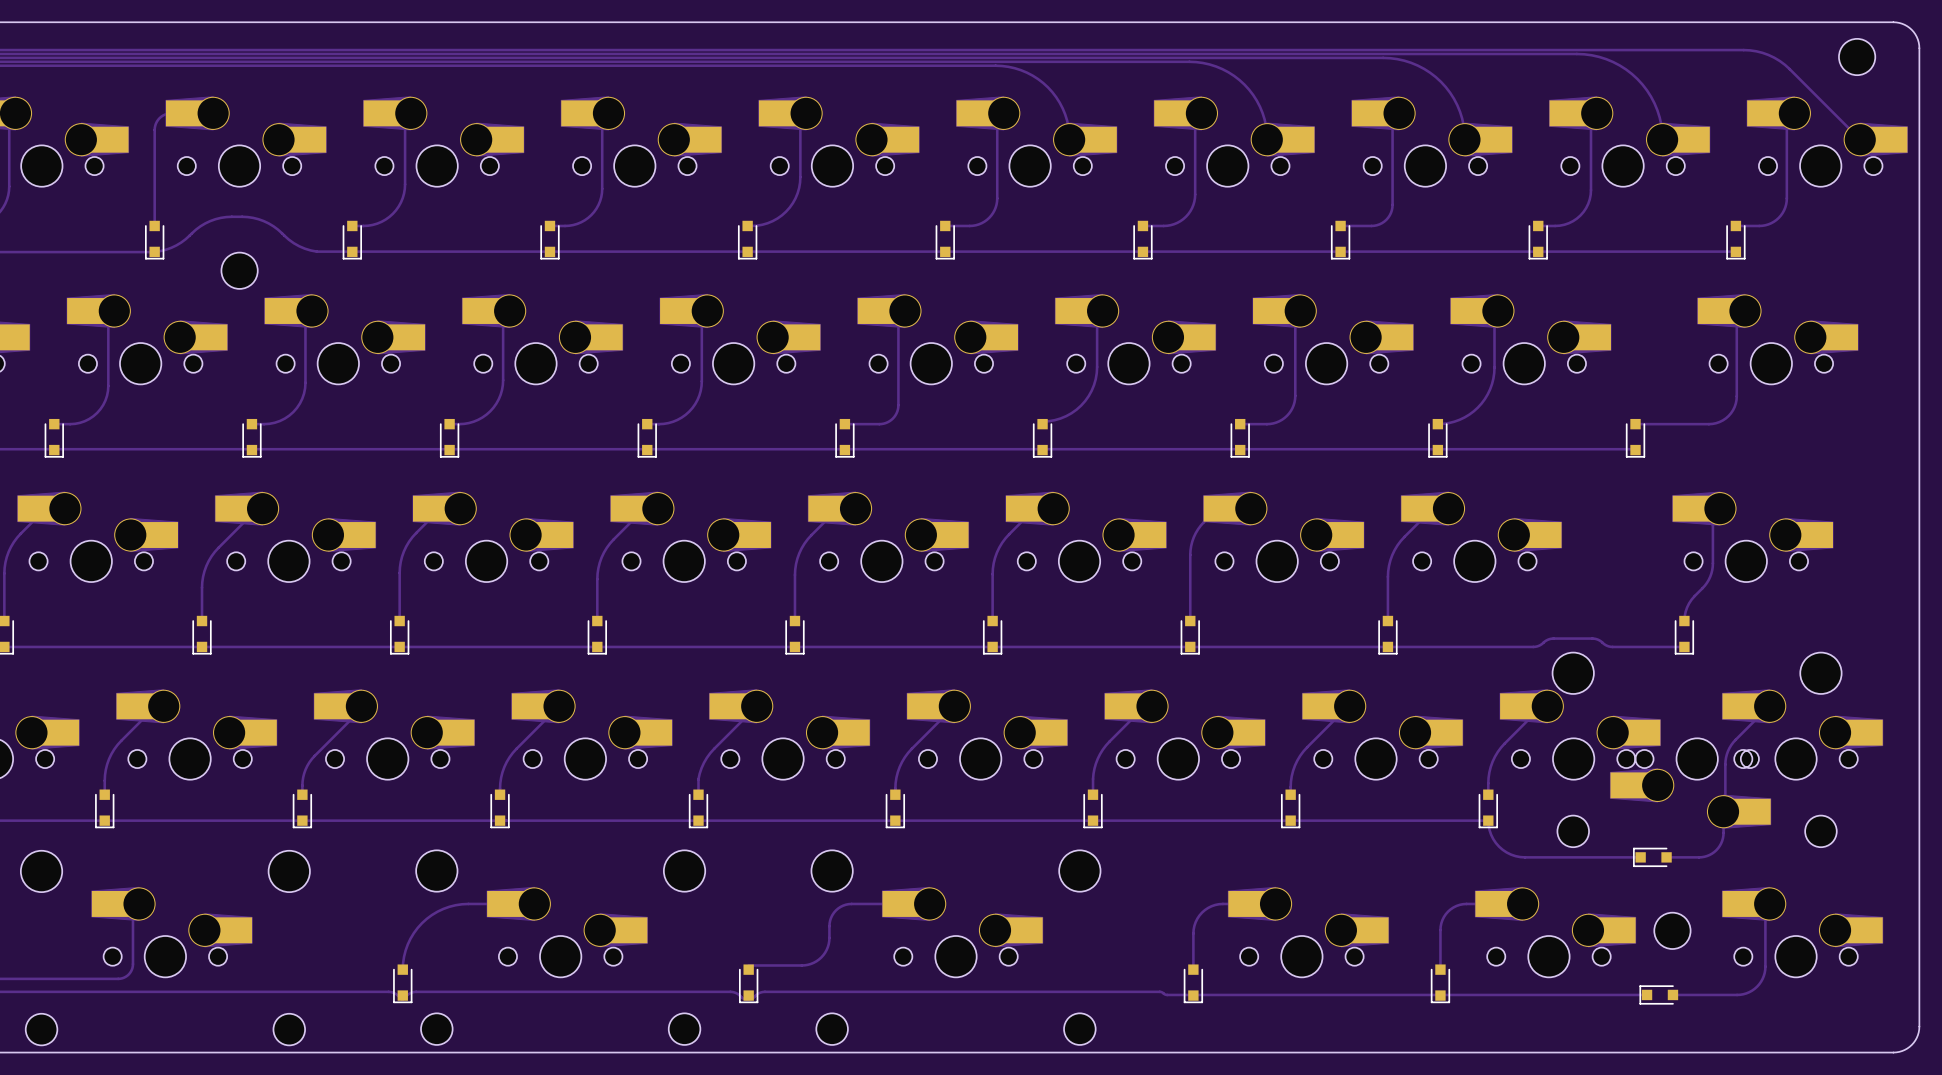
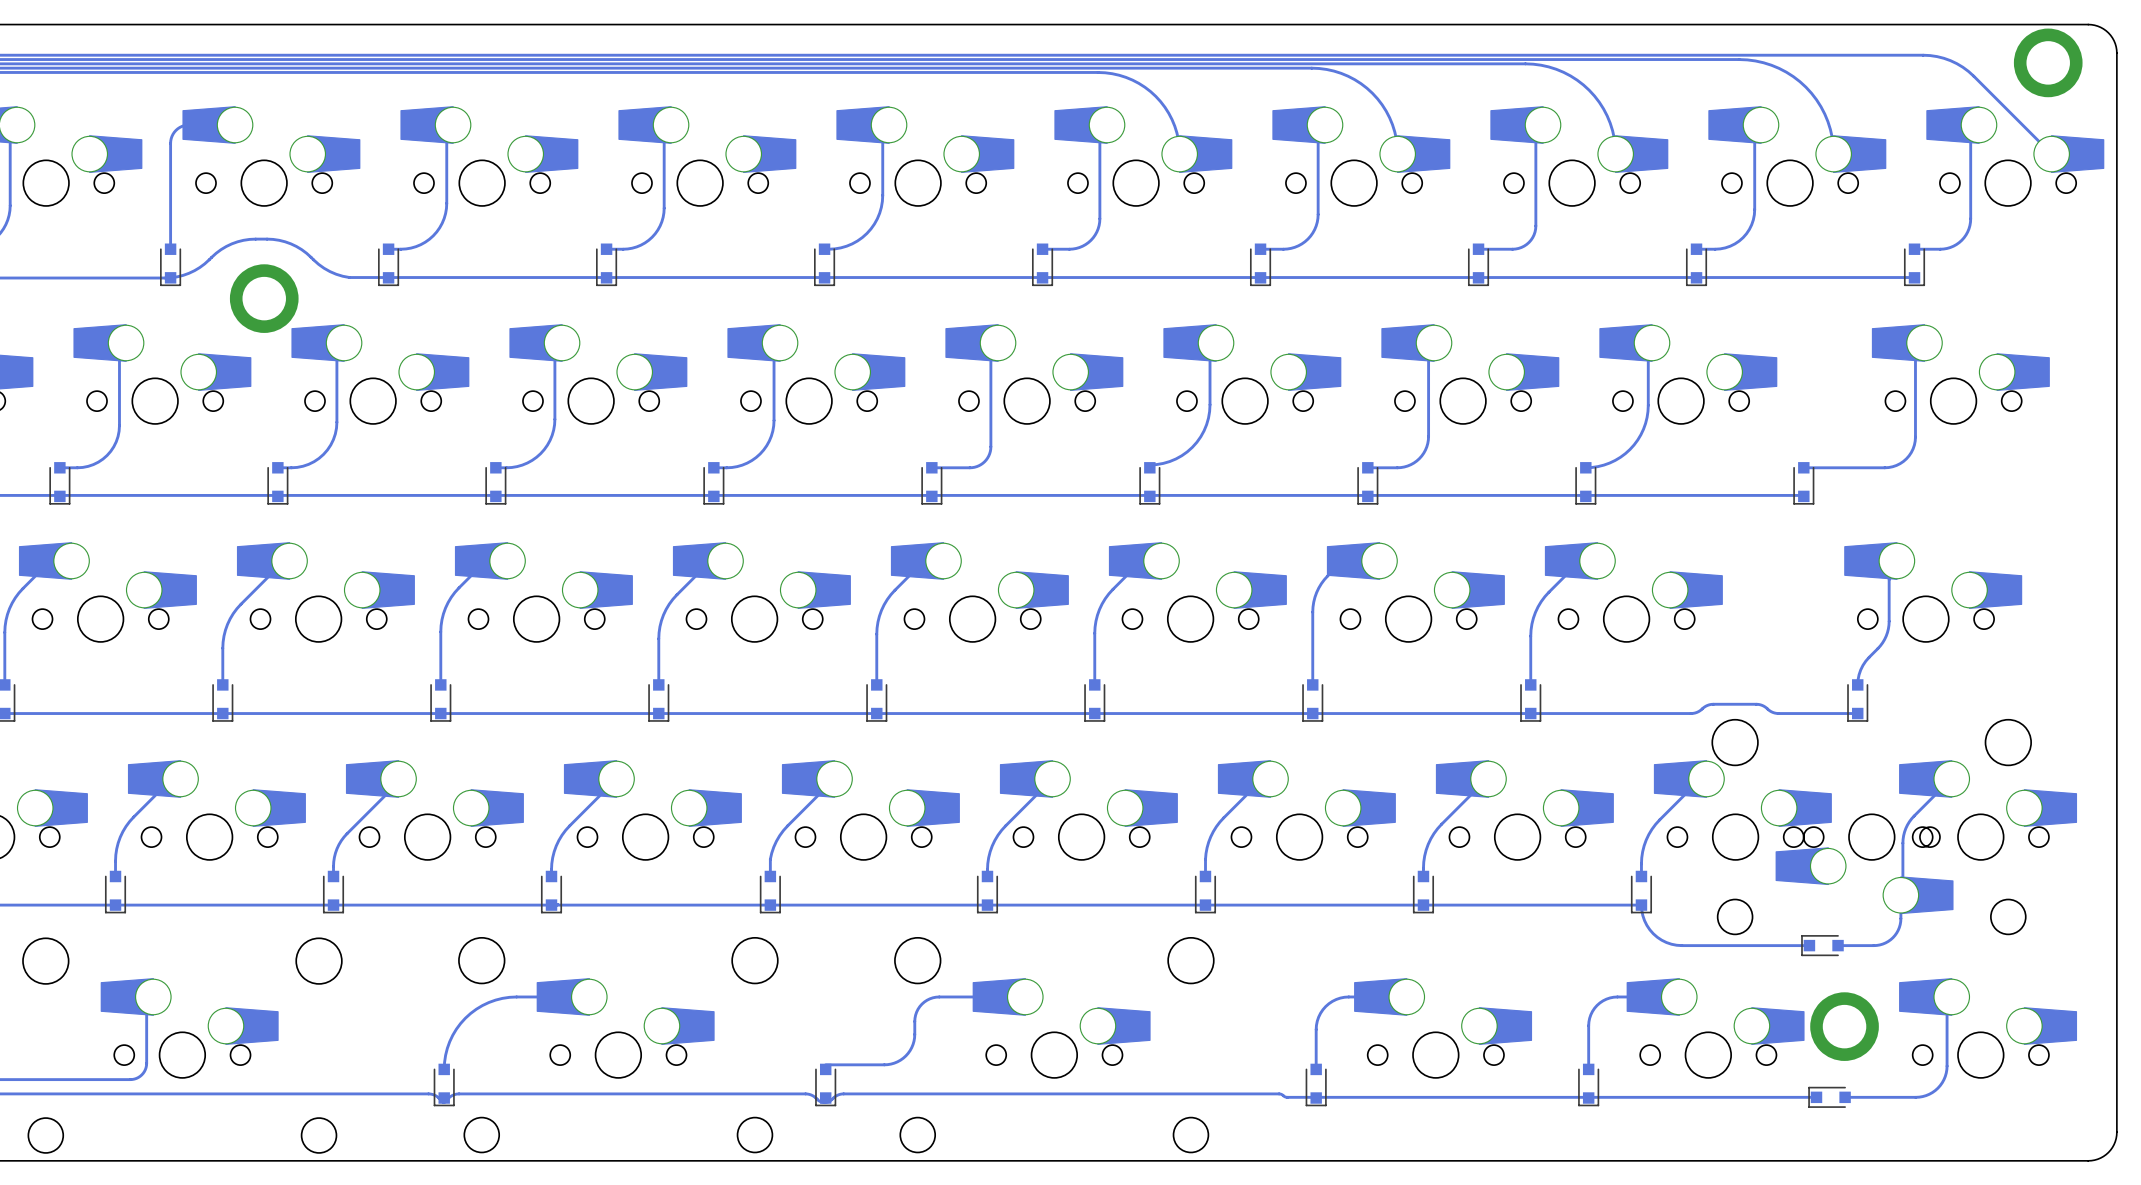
part footprint: [1838, 38, 1876, 76] -> [2013, 28, 2083, 98]
part footprint: [221, 252, 258, 289] -> [229, 264, 299, 333]
part footprint: [1654, 912, 1691, 950] -> [1810, 992, 1879, 1061]

